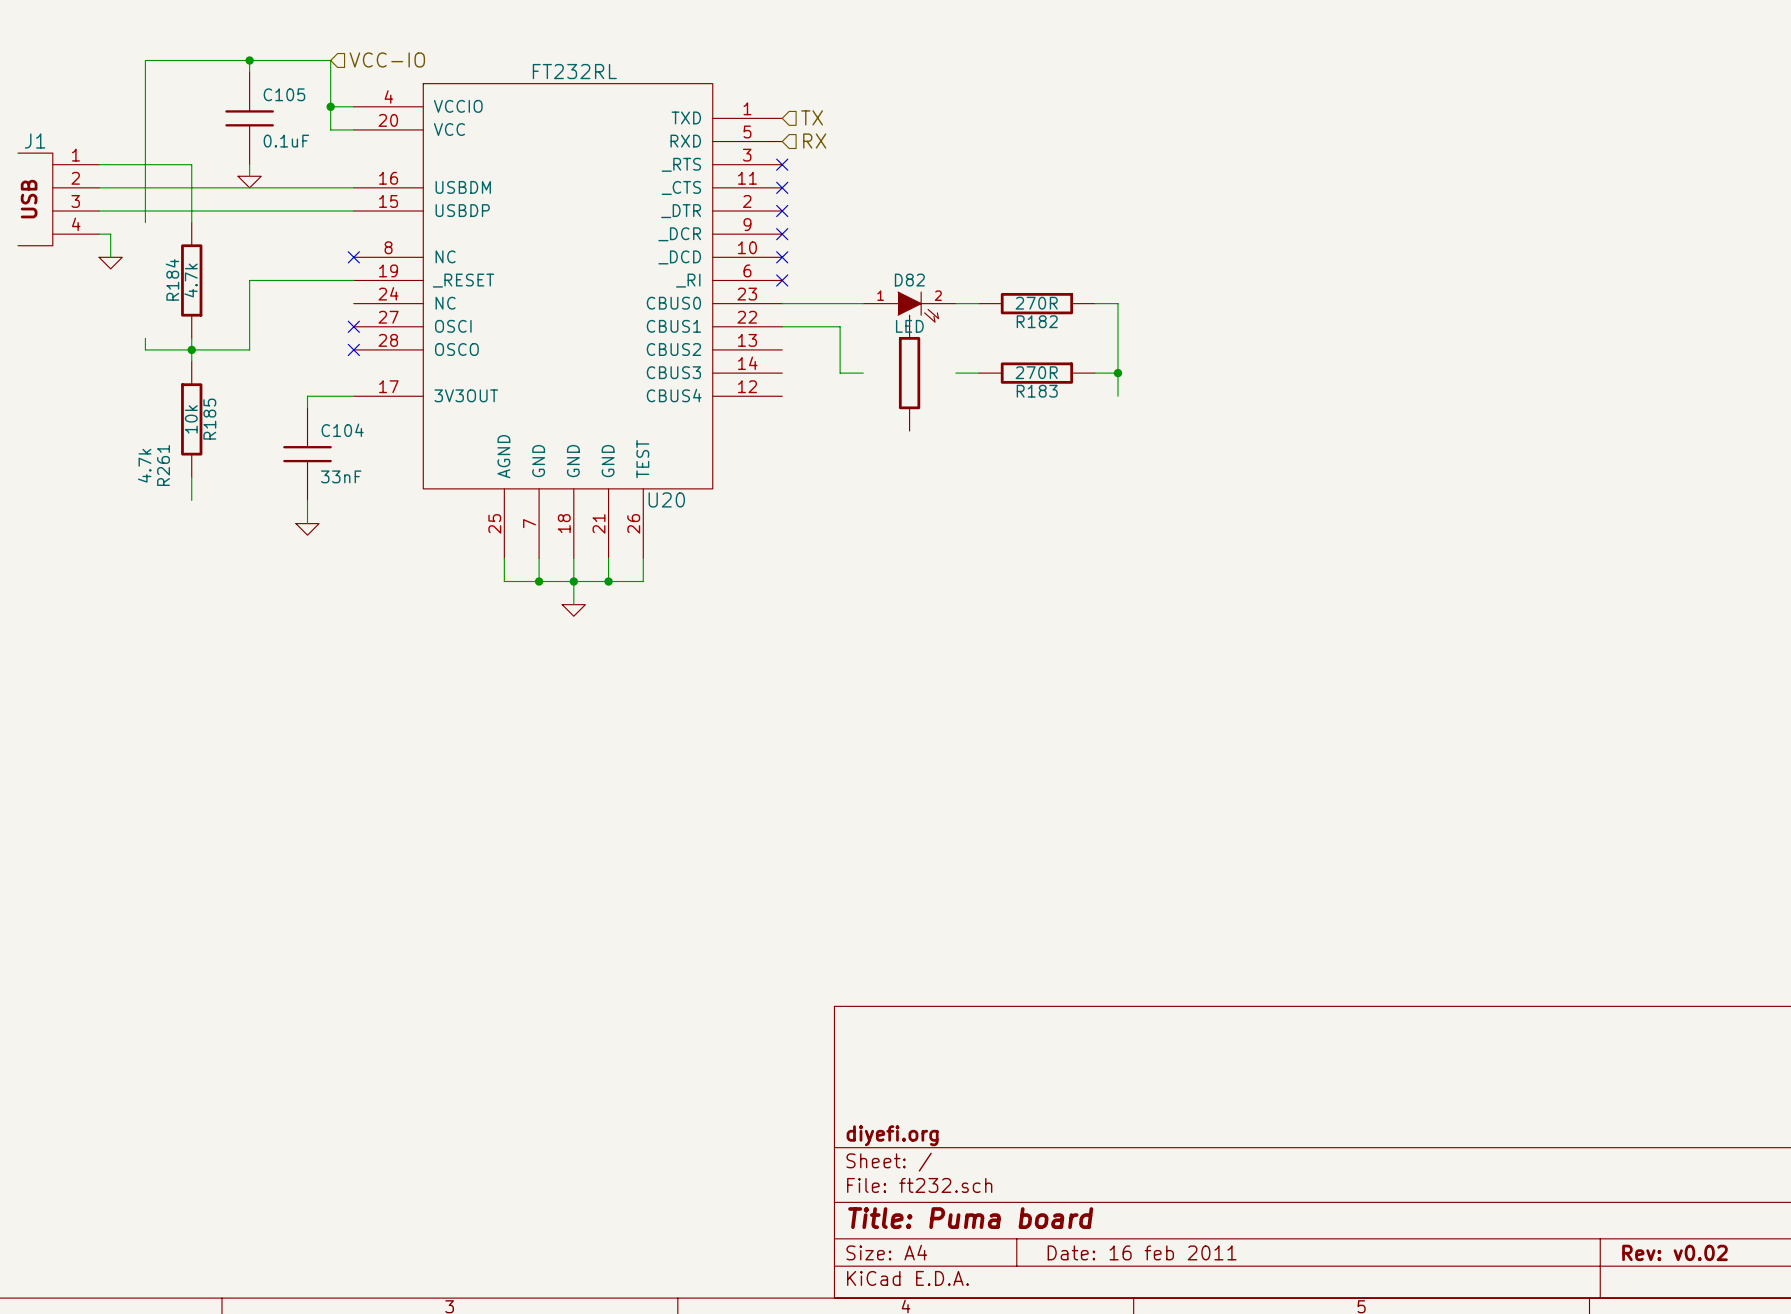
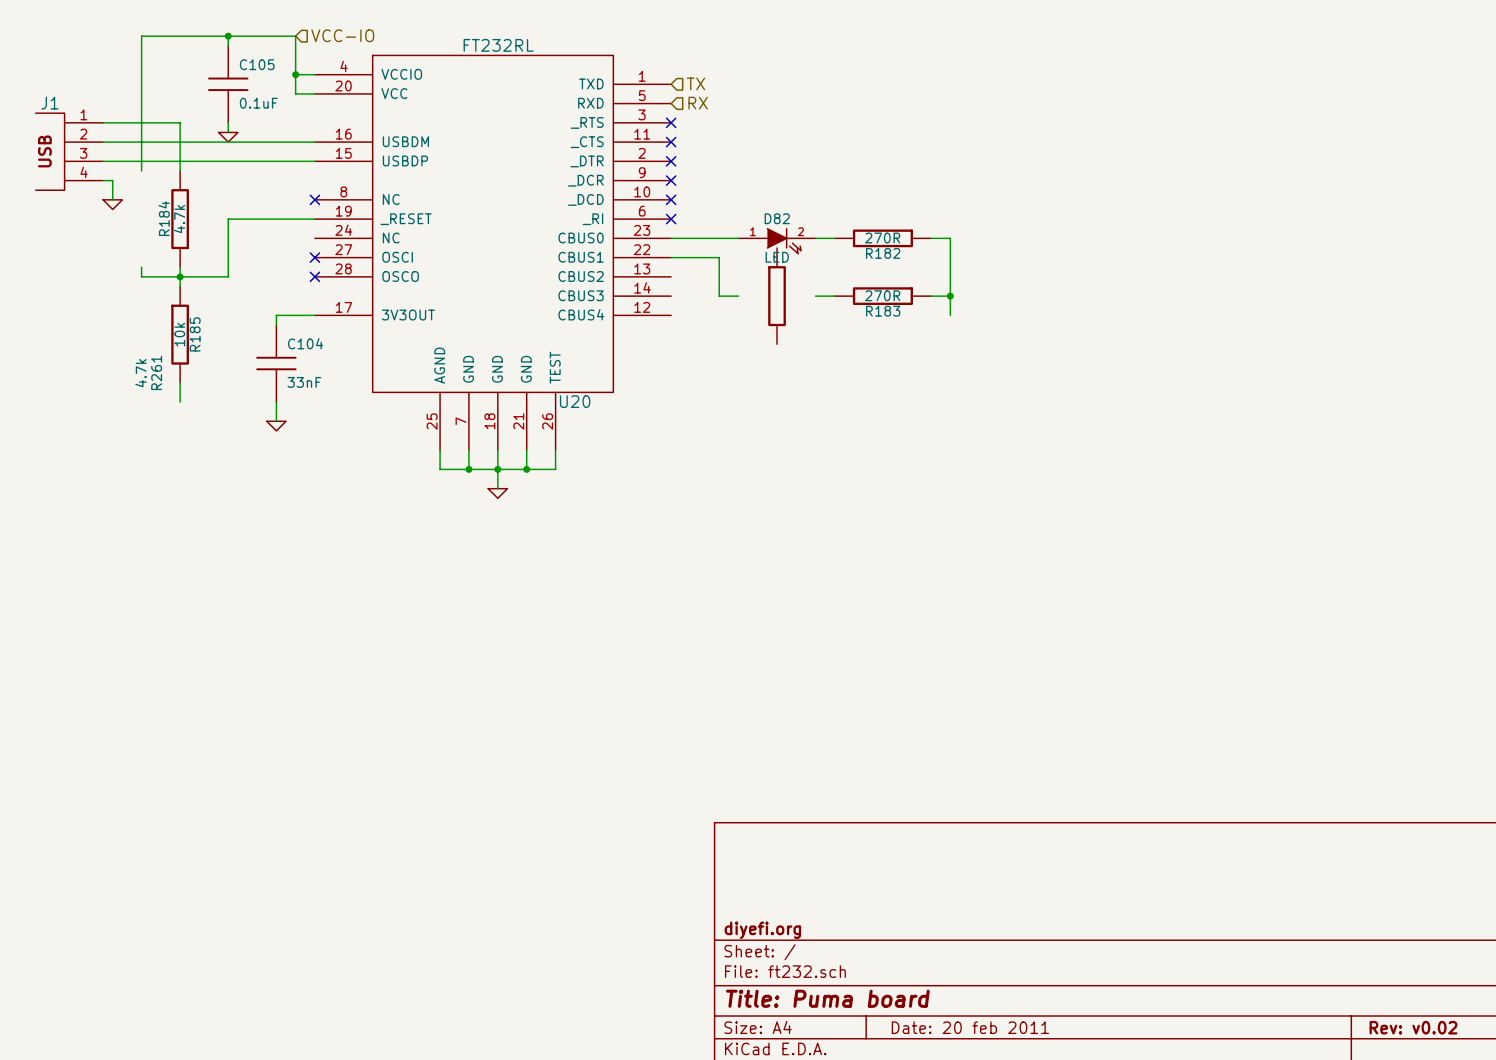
title block: Date: 16 feb 2011 (1142, 1252) -> Date: 20 feb 2011 (970, 1027)

